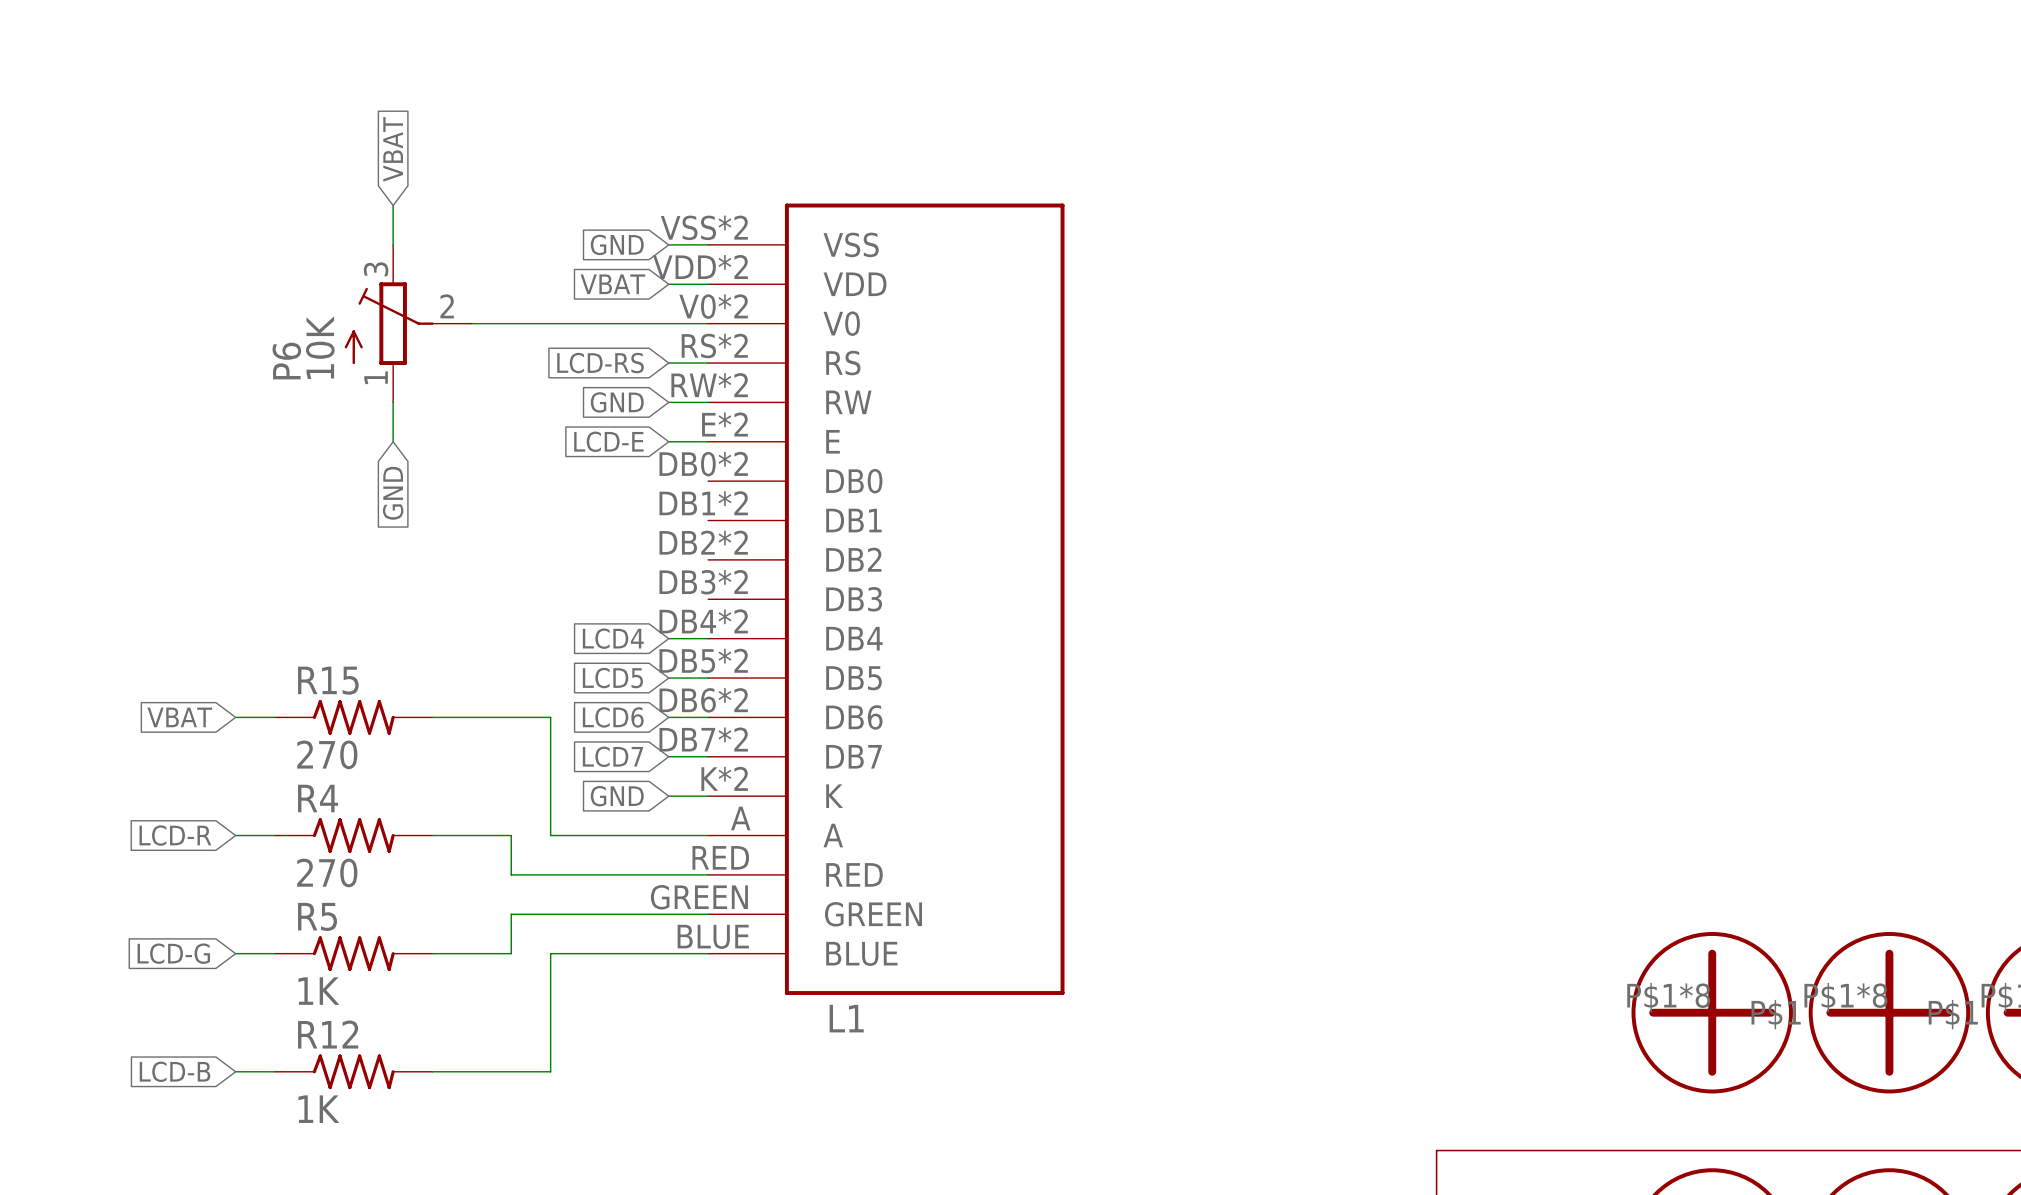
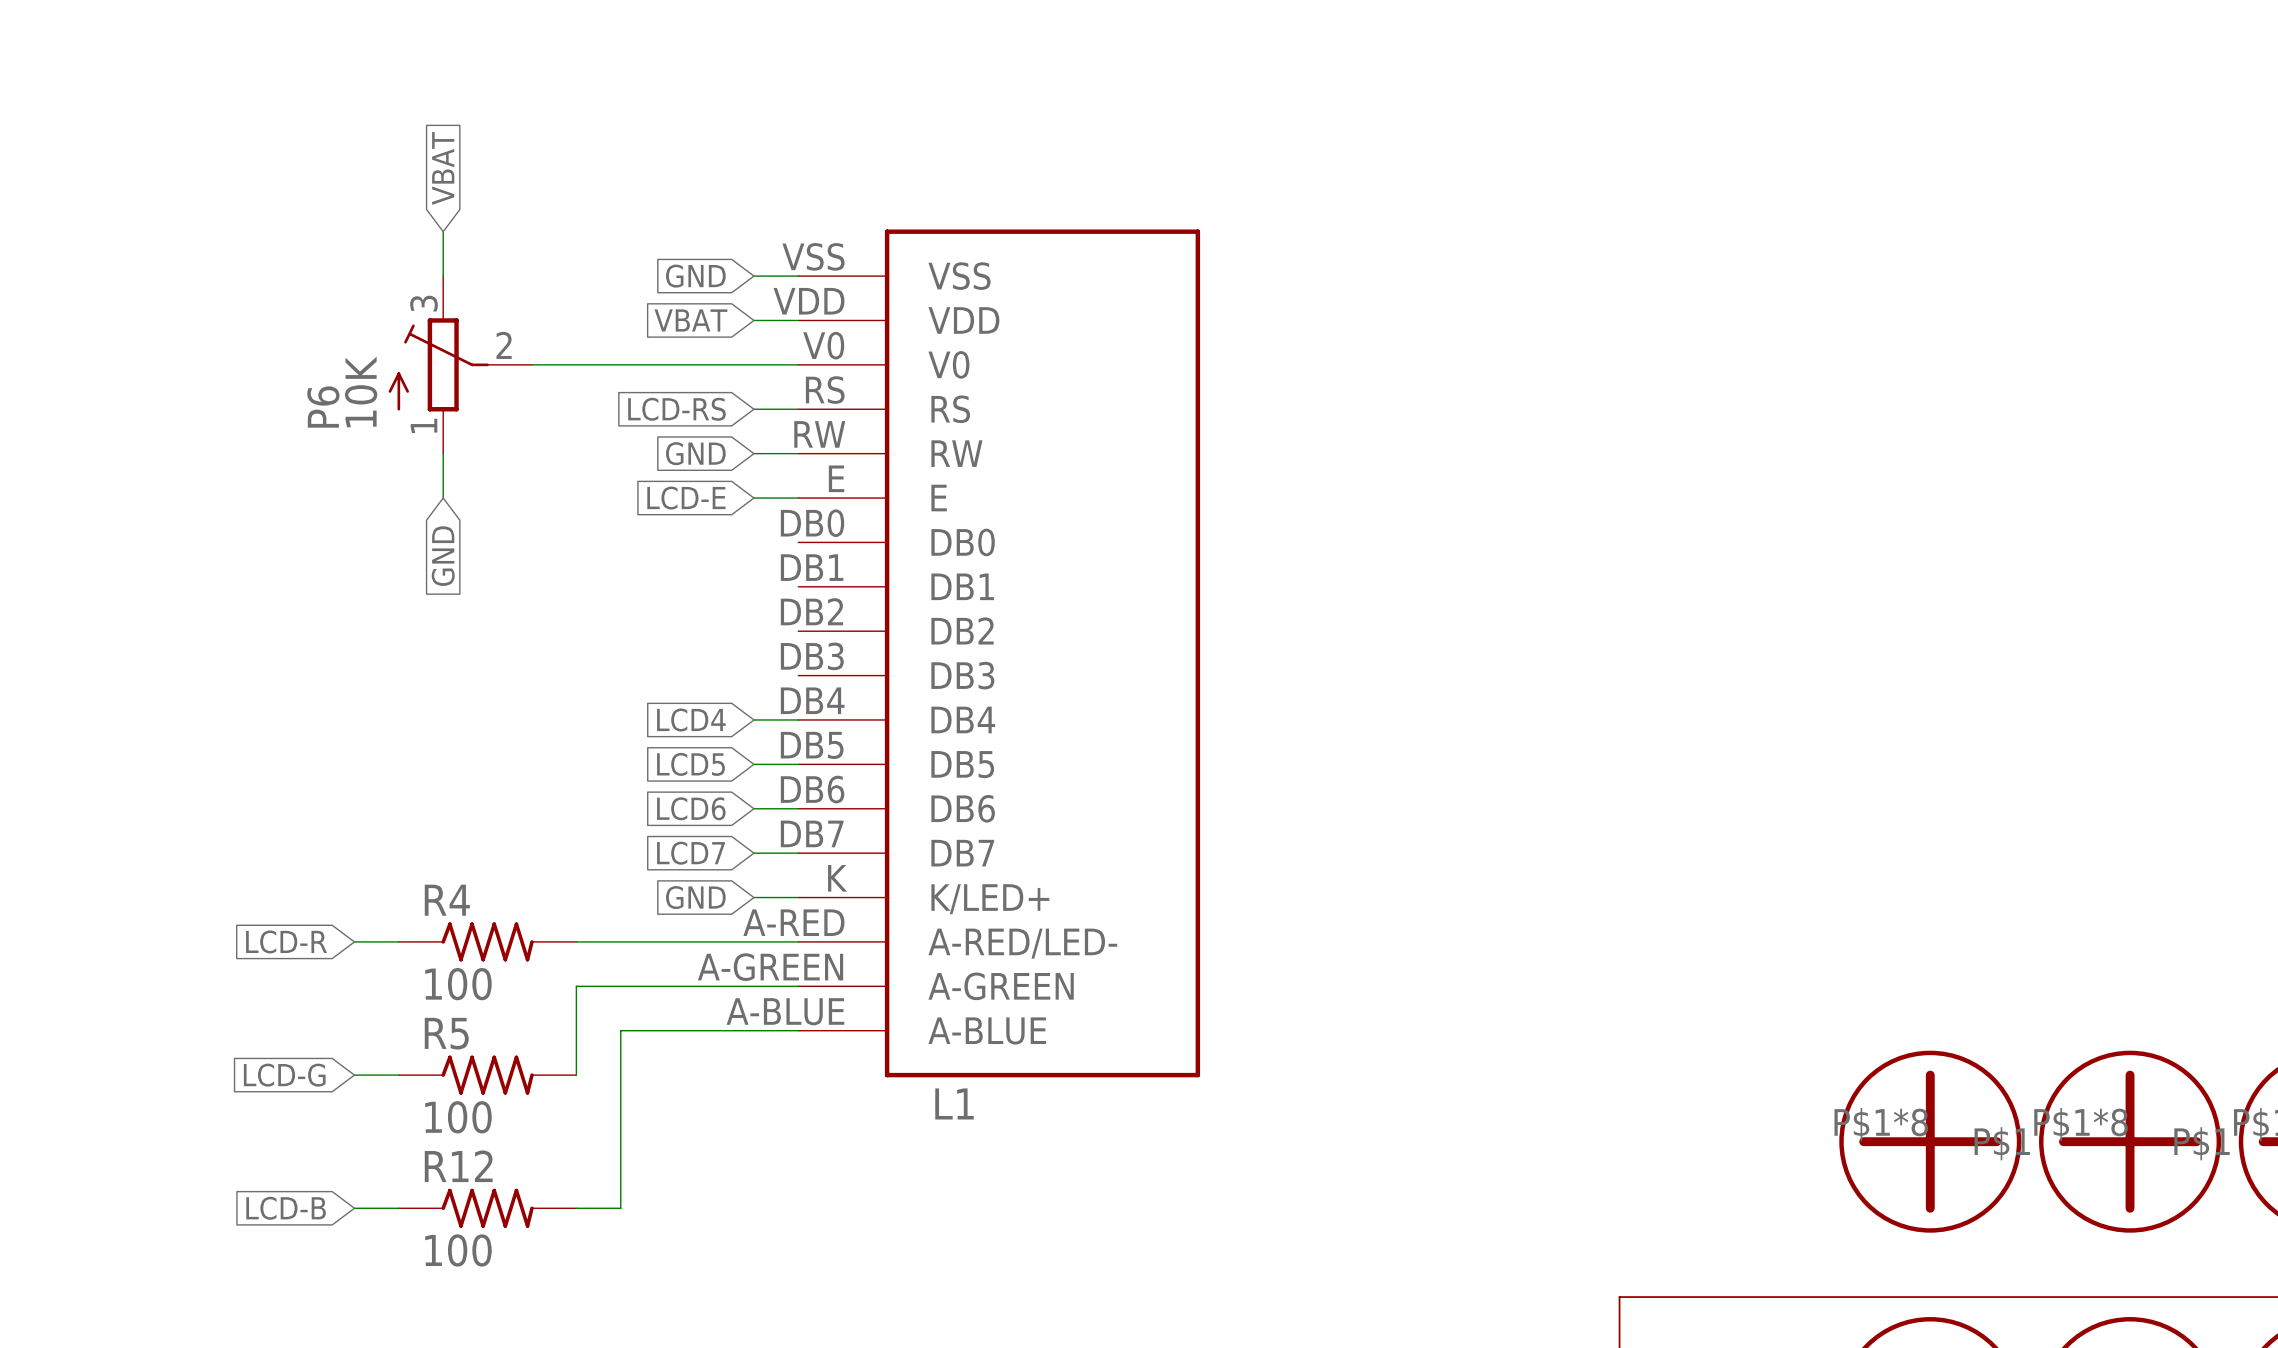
L1 symbol: [708, 203, 1065, 996] -> [798, 229, 1201, 1078]
global label: VBAT (179, 717) -> none
wire: (235, 717) (275, 717) -> none
R15: 270 (353, 717) -> none
wire: (432, 717) (550, 717) (550, 835) -> (576, 941) (620, 941)
global label position: LCD-R (175, 835) -> LCD-R (286, 941)
wire: (235, 835) (275, 835) -> (354, 941) (398, 941)
R4 position: (353, 835) -> (487, 941)
wire: (432, 835) (511, 835) (511, 874) -> (576, 1030) (576, 986)
R4 value: 270 (327, 872) -> 100 (458, 984)
wire: (511, 914) (550, 914) -> (620, 1075) (620, 1030)
global label position: LCD-G (173, 953) -> LCD-G (284, 1075)
wire: (235, 953) (275, 953) -> (354, 1075) (398, 1075)
R5 position: (353, 953) -> (487, 1075)
wire: (550, 953) (708, 953) -> none
R5 value: 1K (318, 991) -> 100 (458, 1117)
global label position: LCD-B (175, 1071) -> LCD-B (286, 1208)
wire: (235, 1071) (275, 1071) -> (354, 1208) (398, 1208)
R12 position: (353, 1071) -> (487, 1208)
R12 value: 1K (318, 1109) -> 100 (458, 1250)

